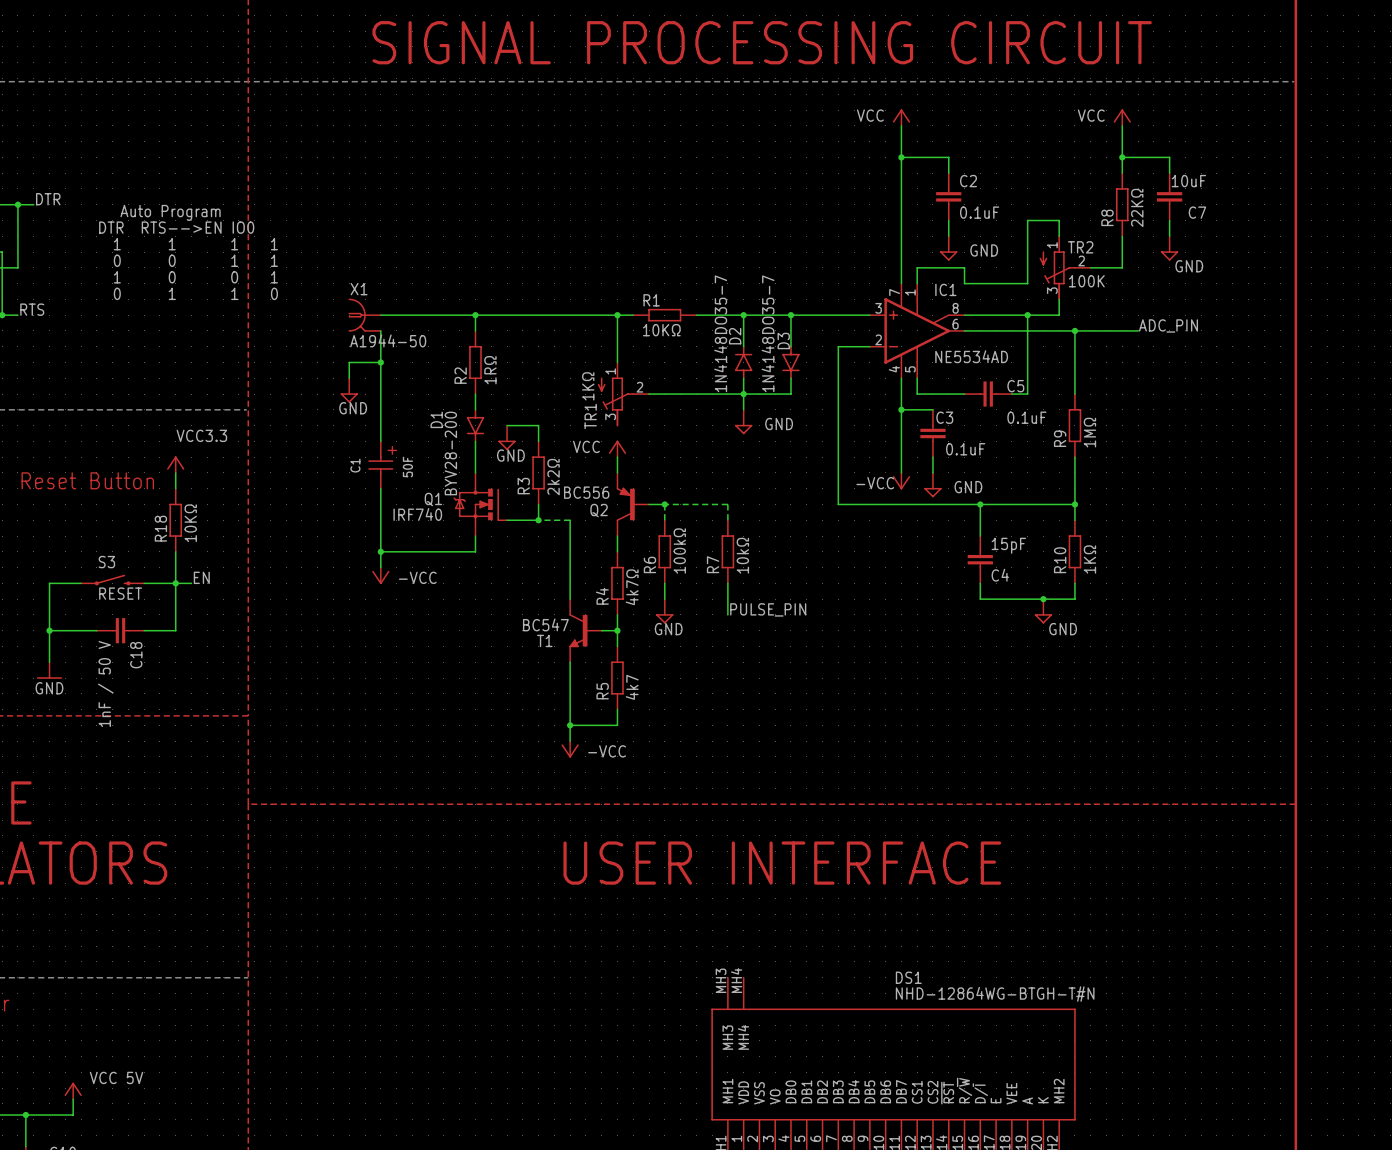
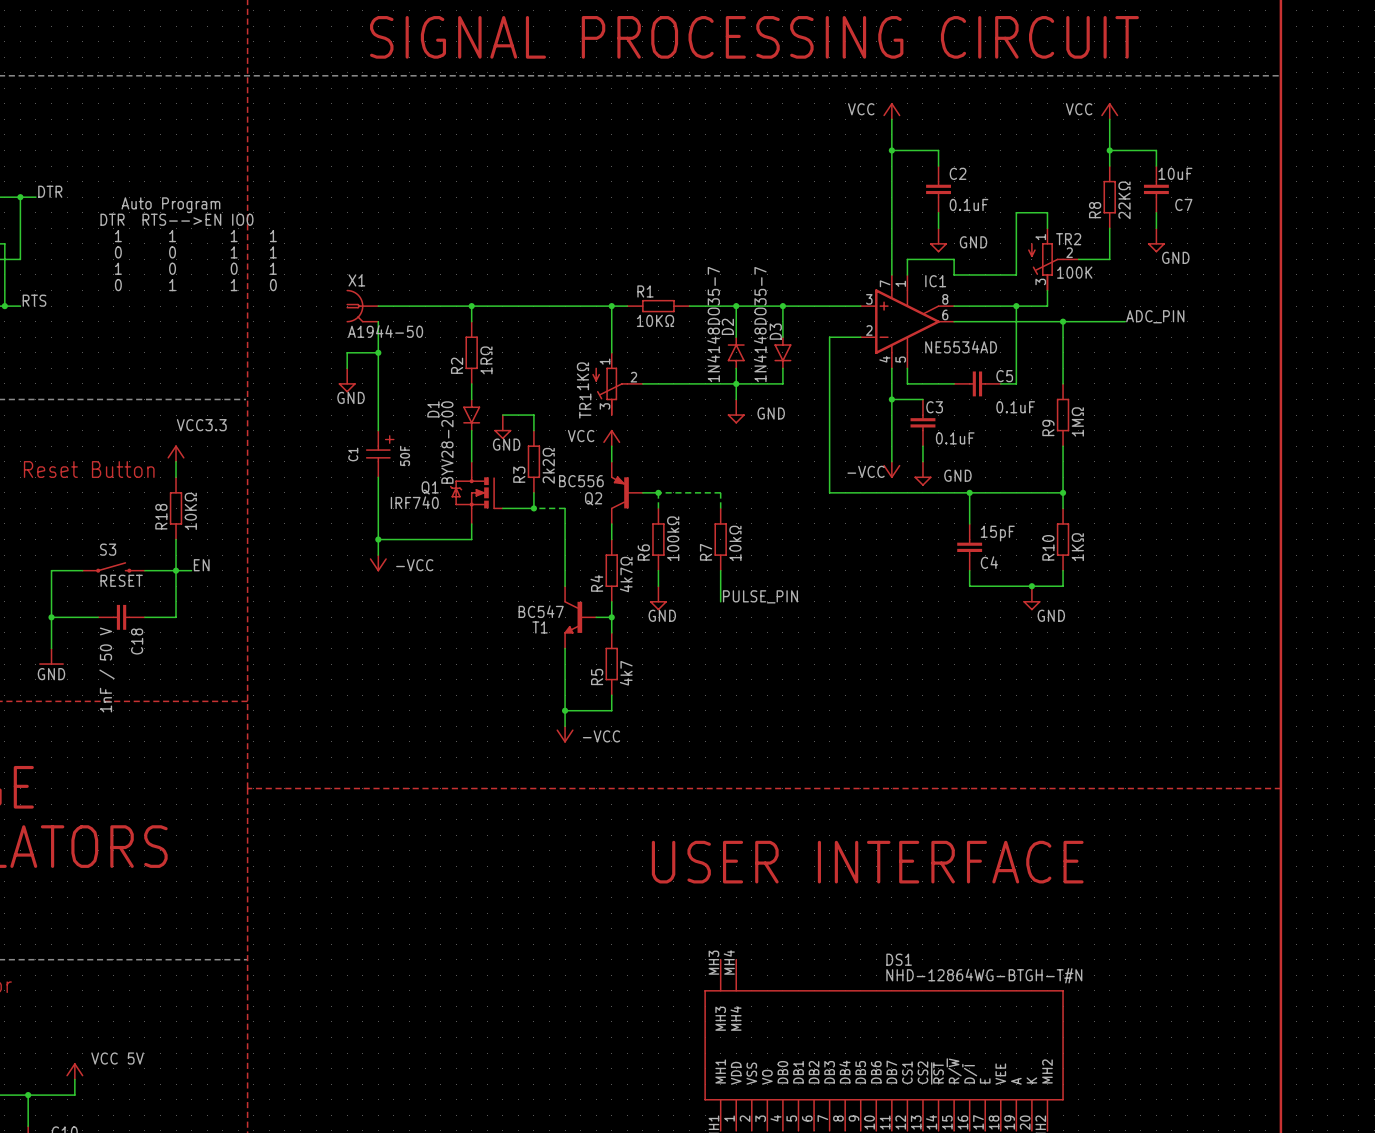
text position: USER INTERFACE (782, 863) -> USER INTERFACE (867, 862)

